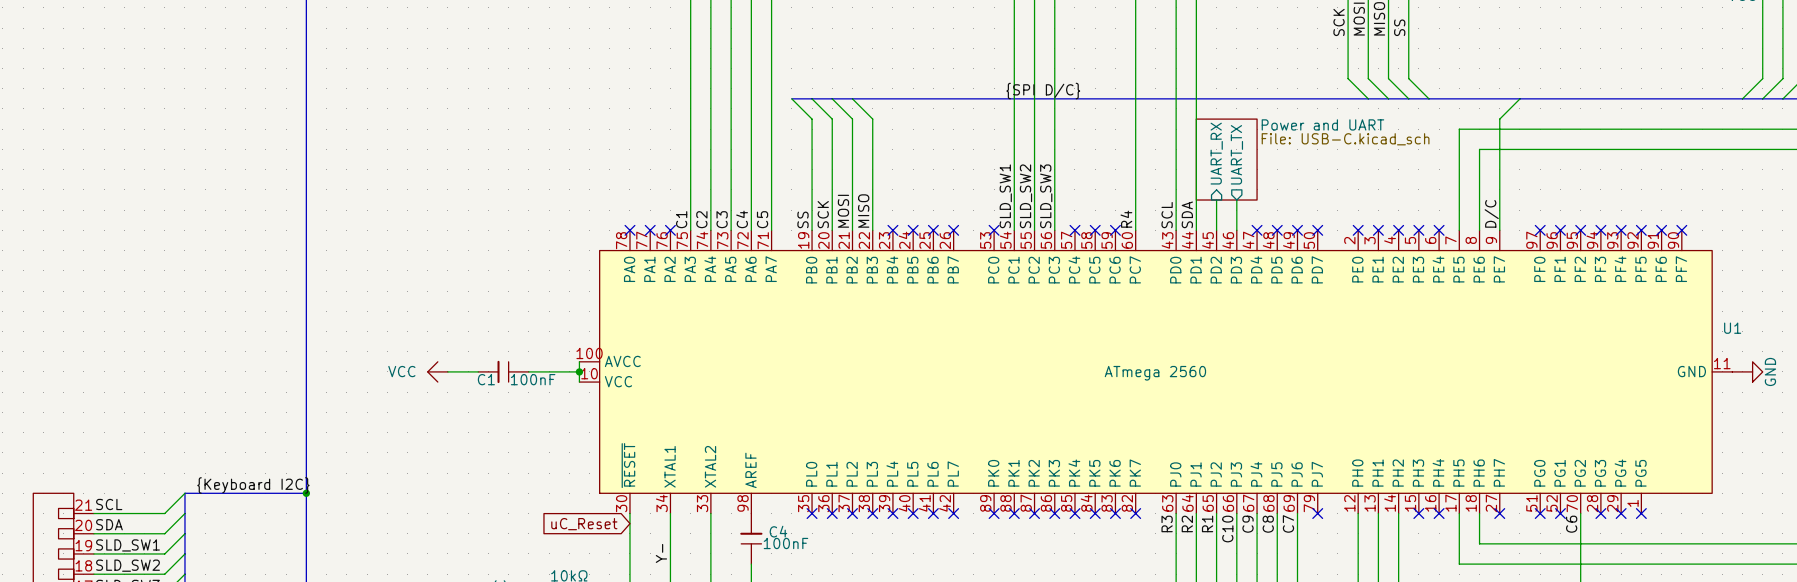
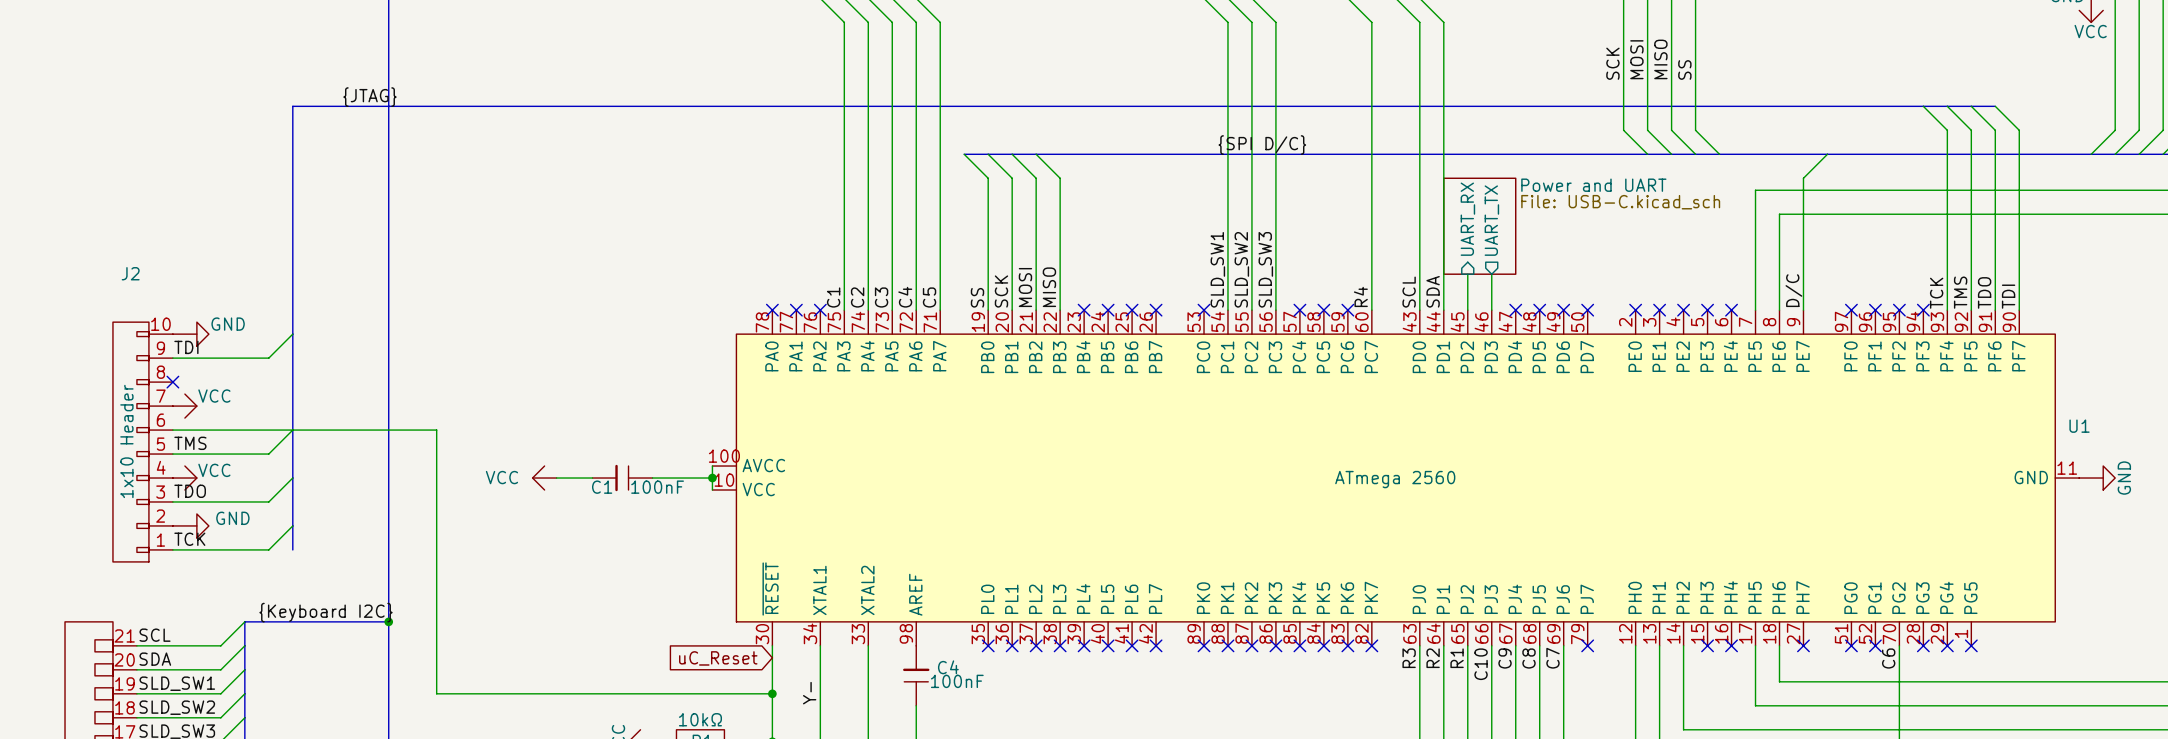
label: none -> {JTAG} (369, 97)
wire: none -> (1923, 106) (1947, 130) (1947, 310)
wire: none -> (1947, 106) (1971, 130) (1971, 310)
wire: none -> (1971, 106) (1995, 130) (1995, 310)
wire: none -> (1995, 106) (2019, 130) (2019, 310)
bus: none -> (1995, 106) (292, 106) (292, 549)
label: none -> TMS (1960, 292)
label: none -> TDO (1984, 292)
label: none -> TCK (1936, 293)
label: none -> TDI (2008, 296)
no-connect mark: (1621, 230) -> none
no-connect mark: (1641, 230) -> none
no-connect mark: (1661, 230) -> none
no-connect mark: (1681, 230) -> none
power symbol: none -> GND (190, 334)
wire: none -> (292, 334) (268, 358) (172, 358)
label: none -> TDI (186, 347)
no-connect mark: none -> (172, 382)
power symbol: none -> VCC (184, 406)
wire: none -> (172, 430) (436, 430) (436, 693) (772, 693)
wire: none -> (292, 430) (268, 454) (172, 454)
J2: none -> 1x10 Header (142, 442)
label: none -> TMS (190, 443)
power symbol: none -> VCC (184, 478)
wire: none -> (292, 478) (268, 501) (172, 501)
label: none -> TDO (190, 491)
power symbol: none -> GND (190, 525)
wire: none -> (292, 525) (268, 549) (172, 549)
label: none -> TCK (189, 539)
junction: none -> (772, 693)

